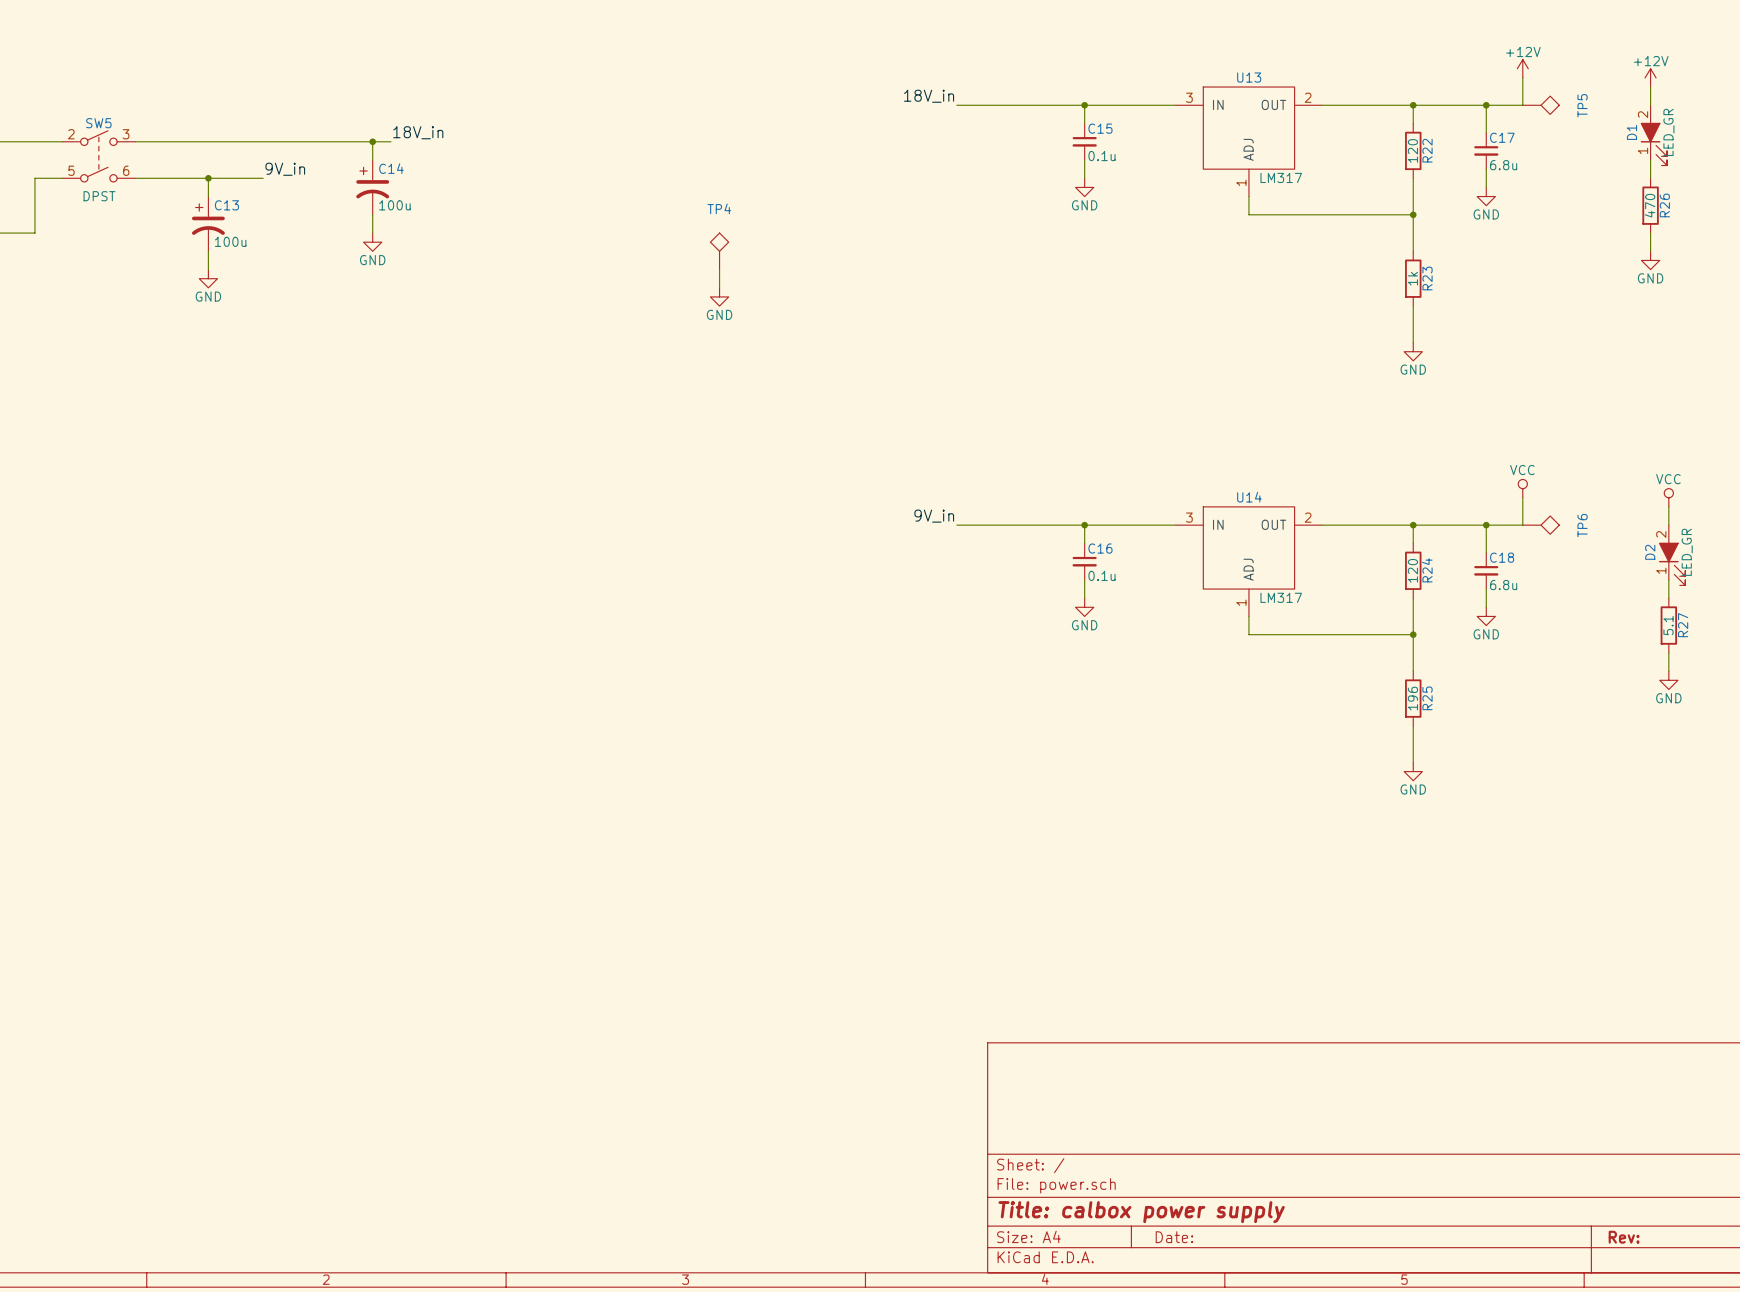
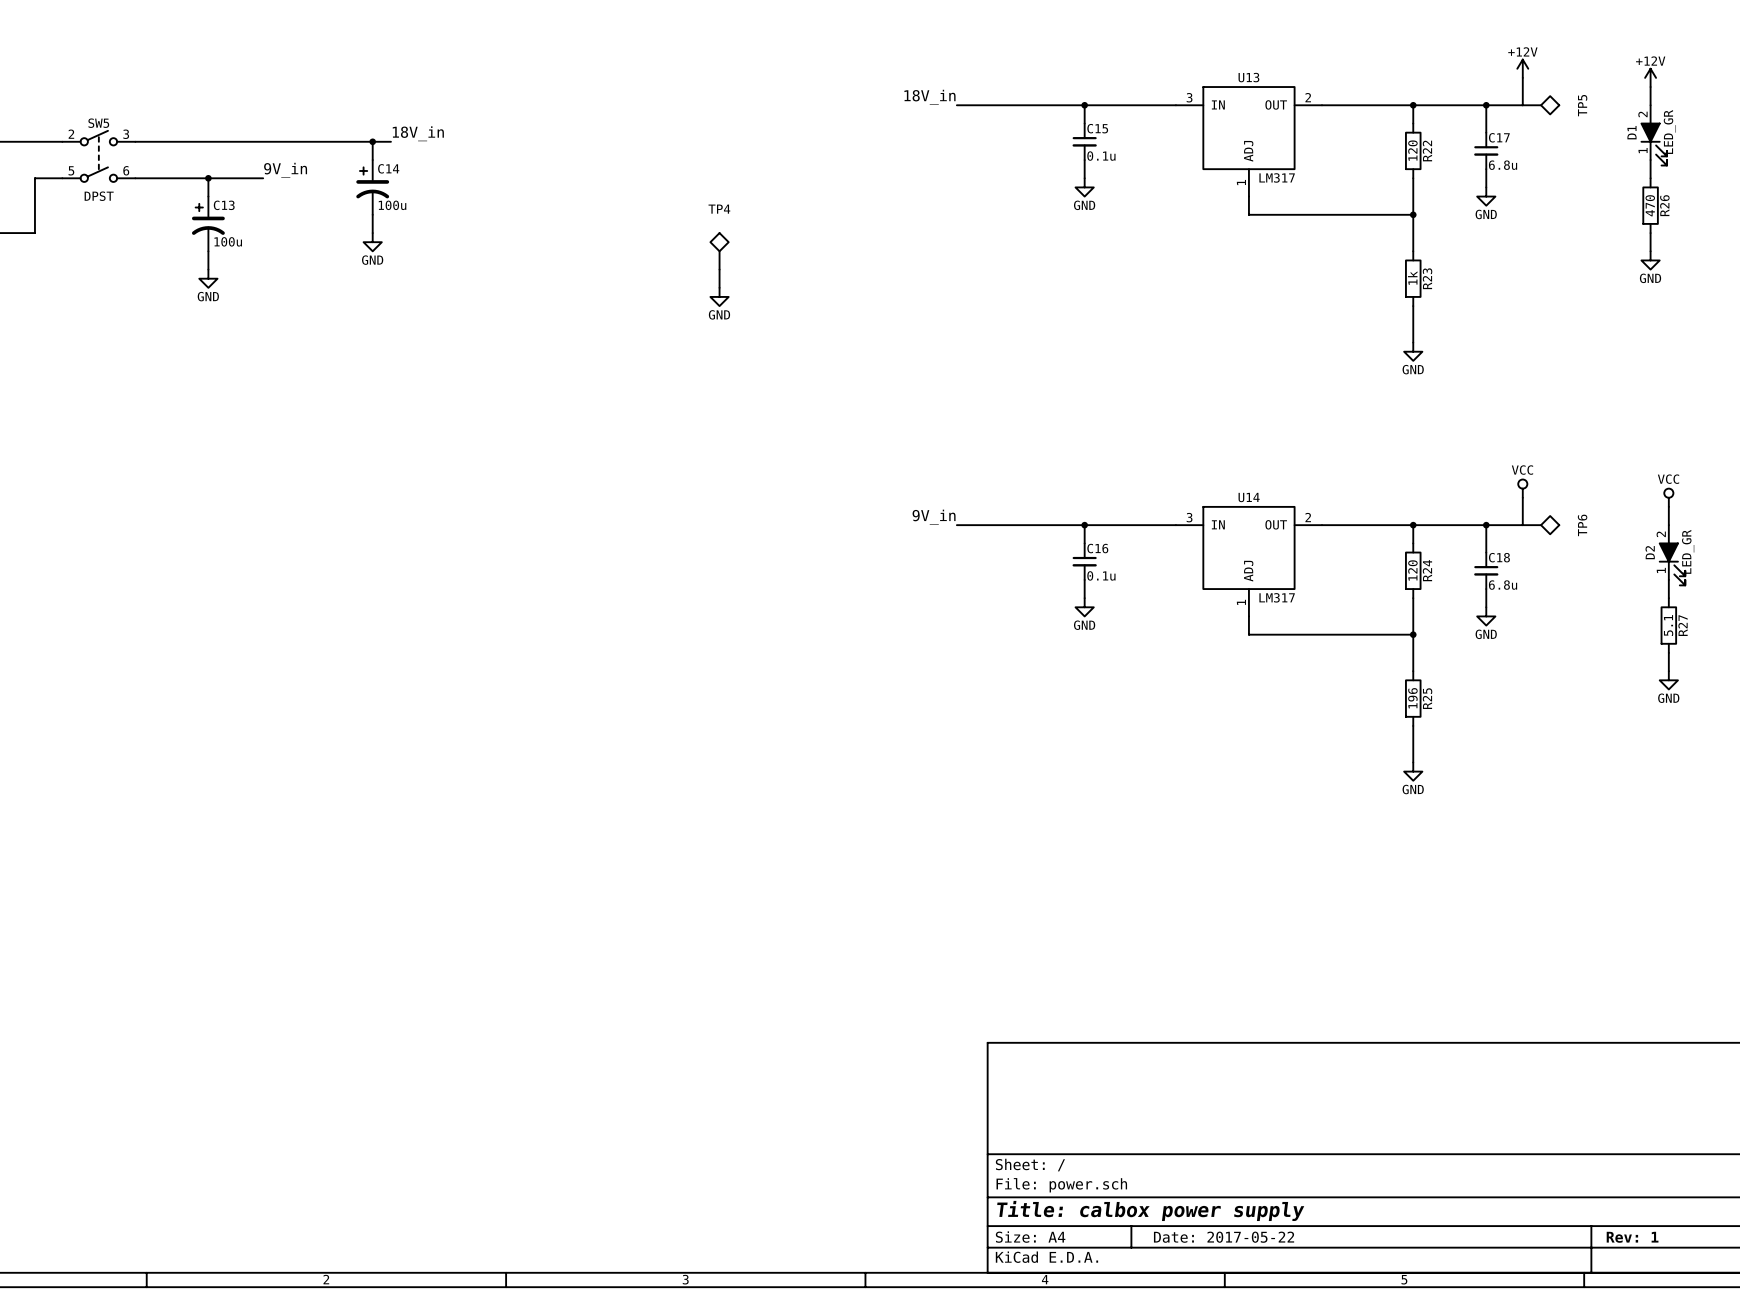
title block: Date: (1174, 1237) -> Date: 2017-05-22 (1224, 1237)
title block: Rev: (1624, 1237) -> Rev: 1 (1632, 1237)

